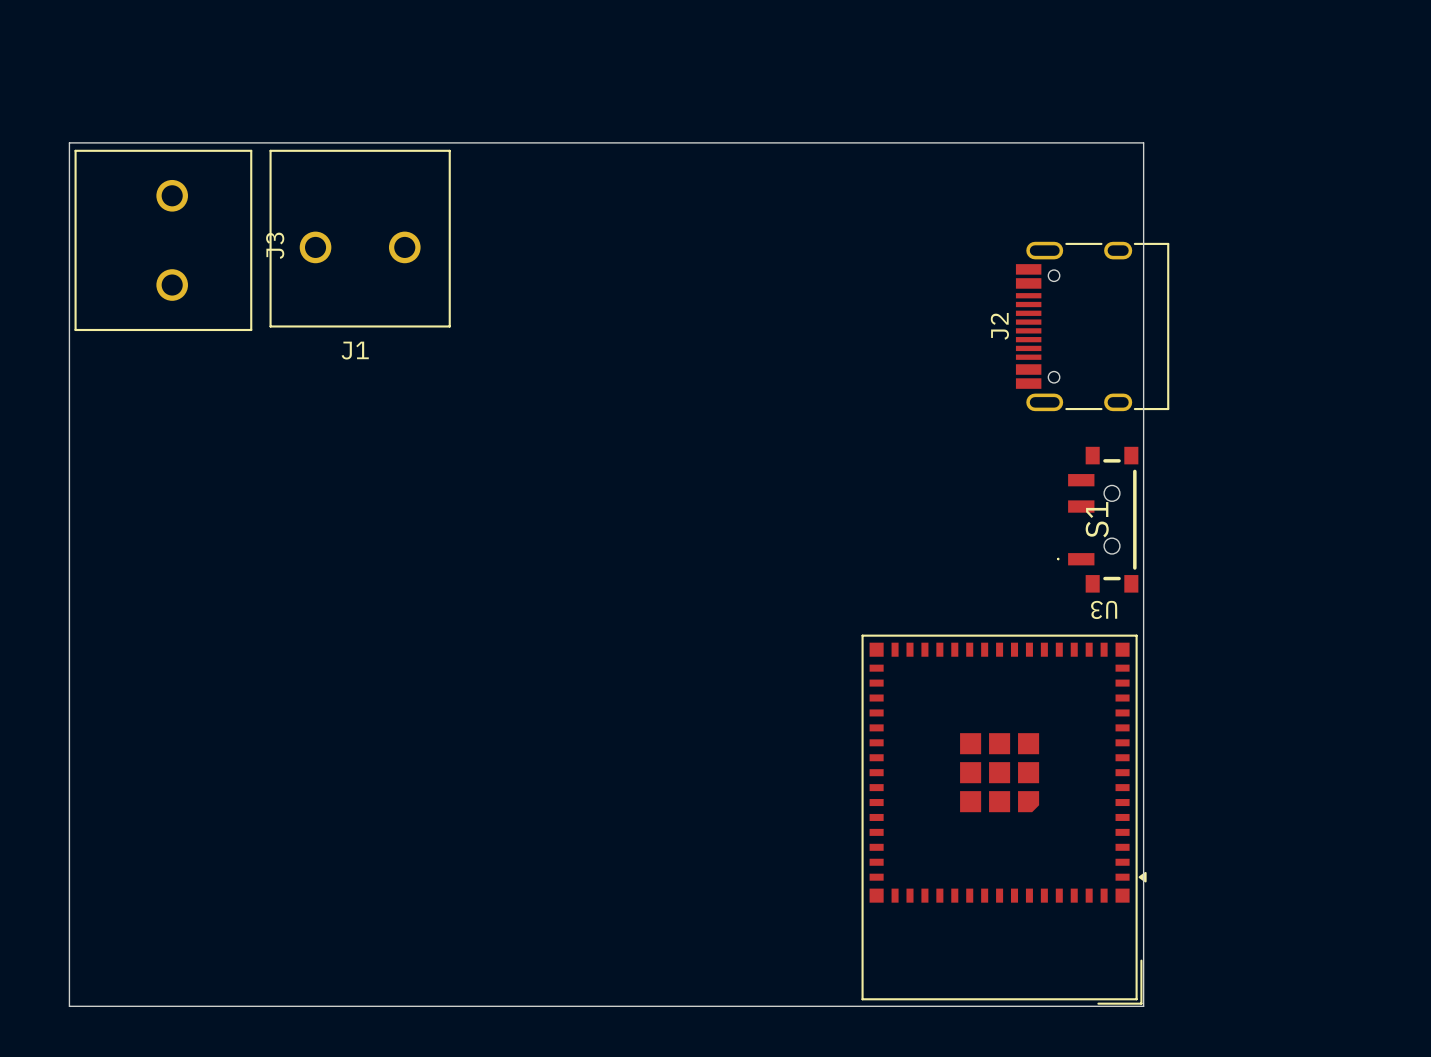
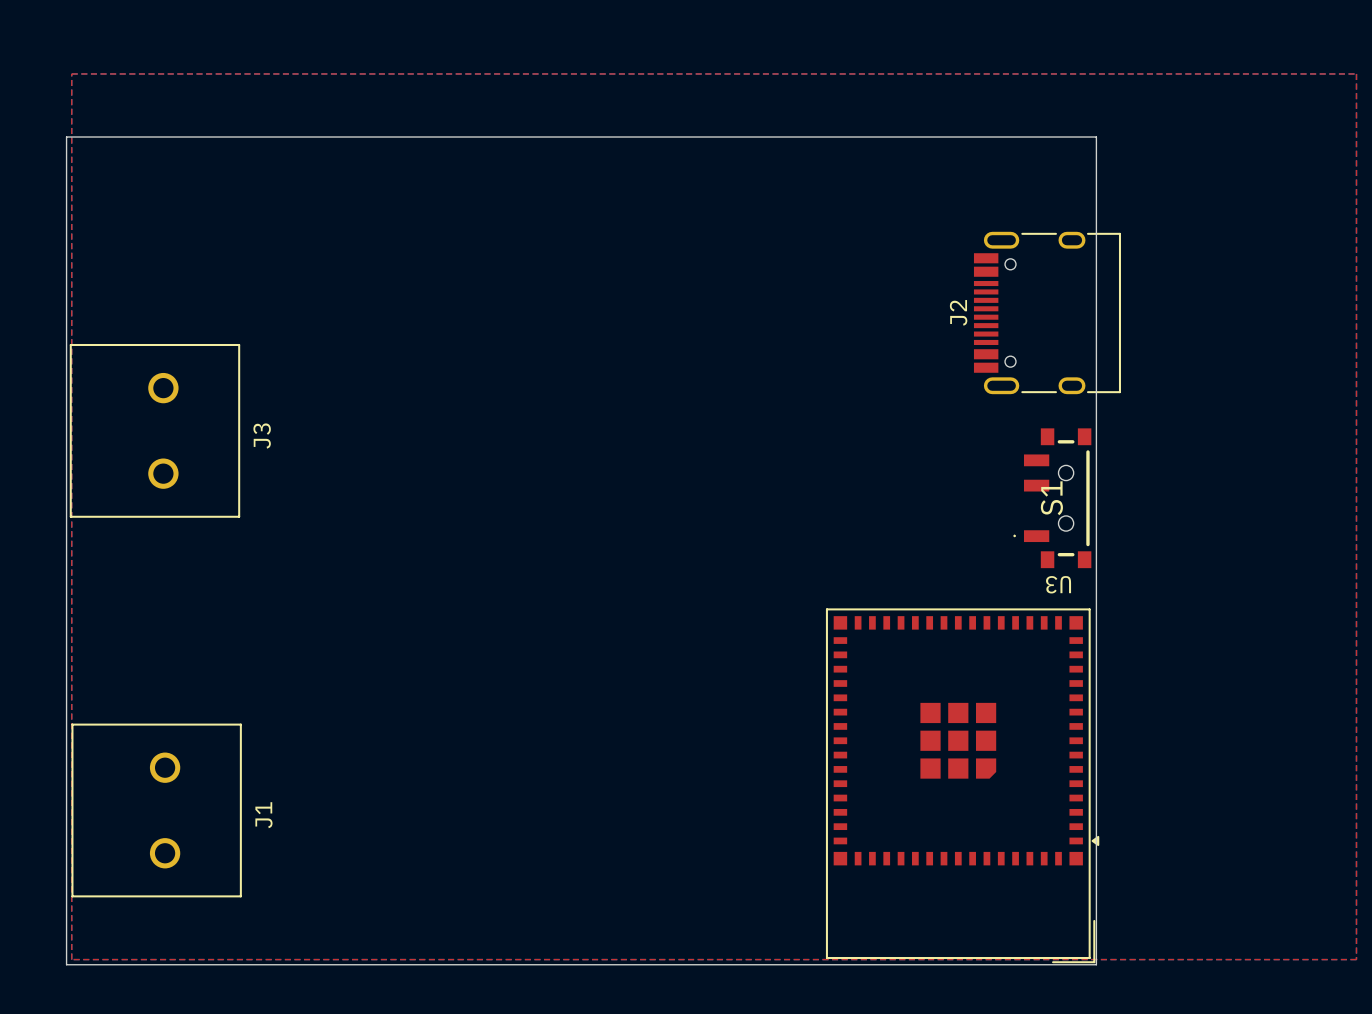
top zone outline: none -> (71, 73) (71, 959) (1356, 959) (1356, 73) (71, 73)
J1 rotation: 0° (360, 238) -> 90° counterclockwise (156, 810)
J1 position: (360, 238) -> (156, 810)
J3 position: (163, 240) -> (154, 430)

